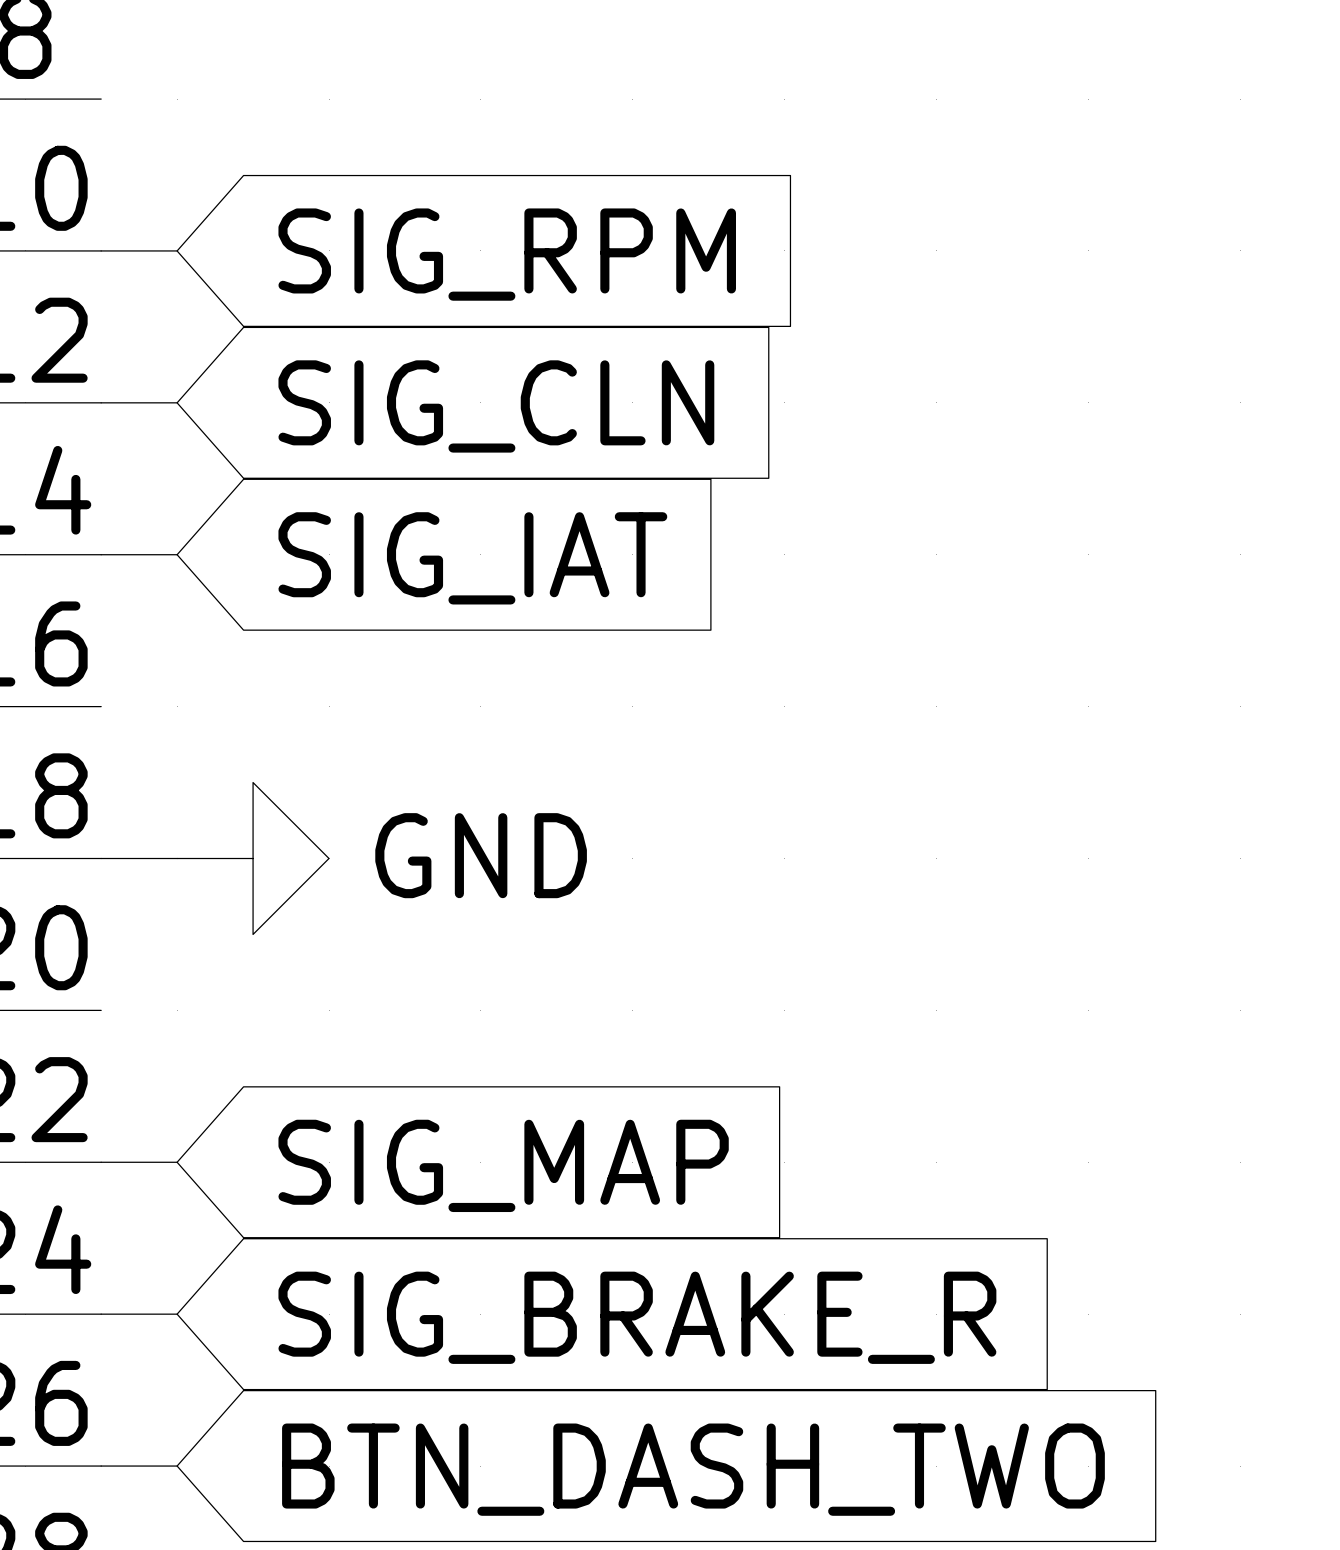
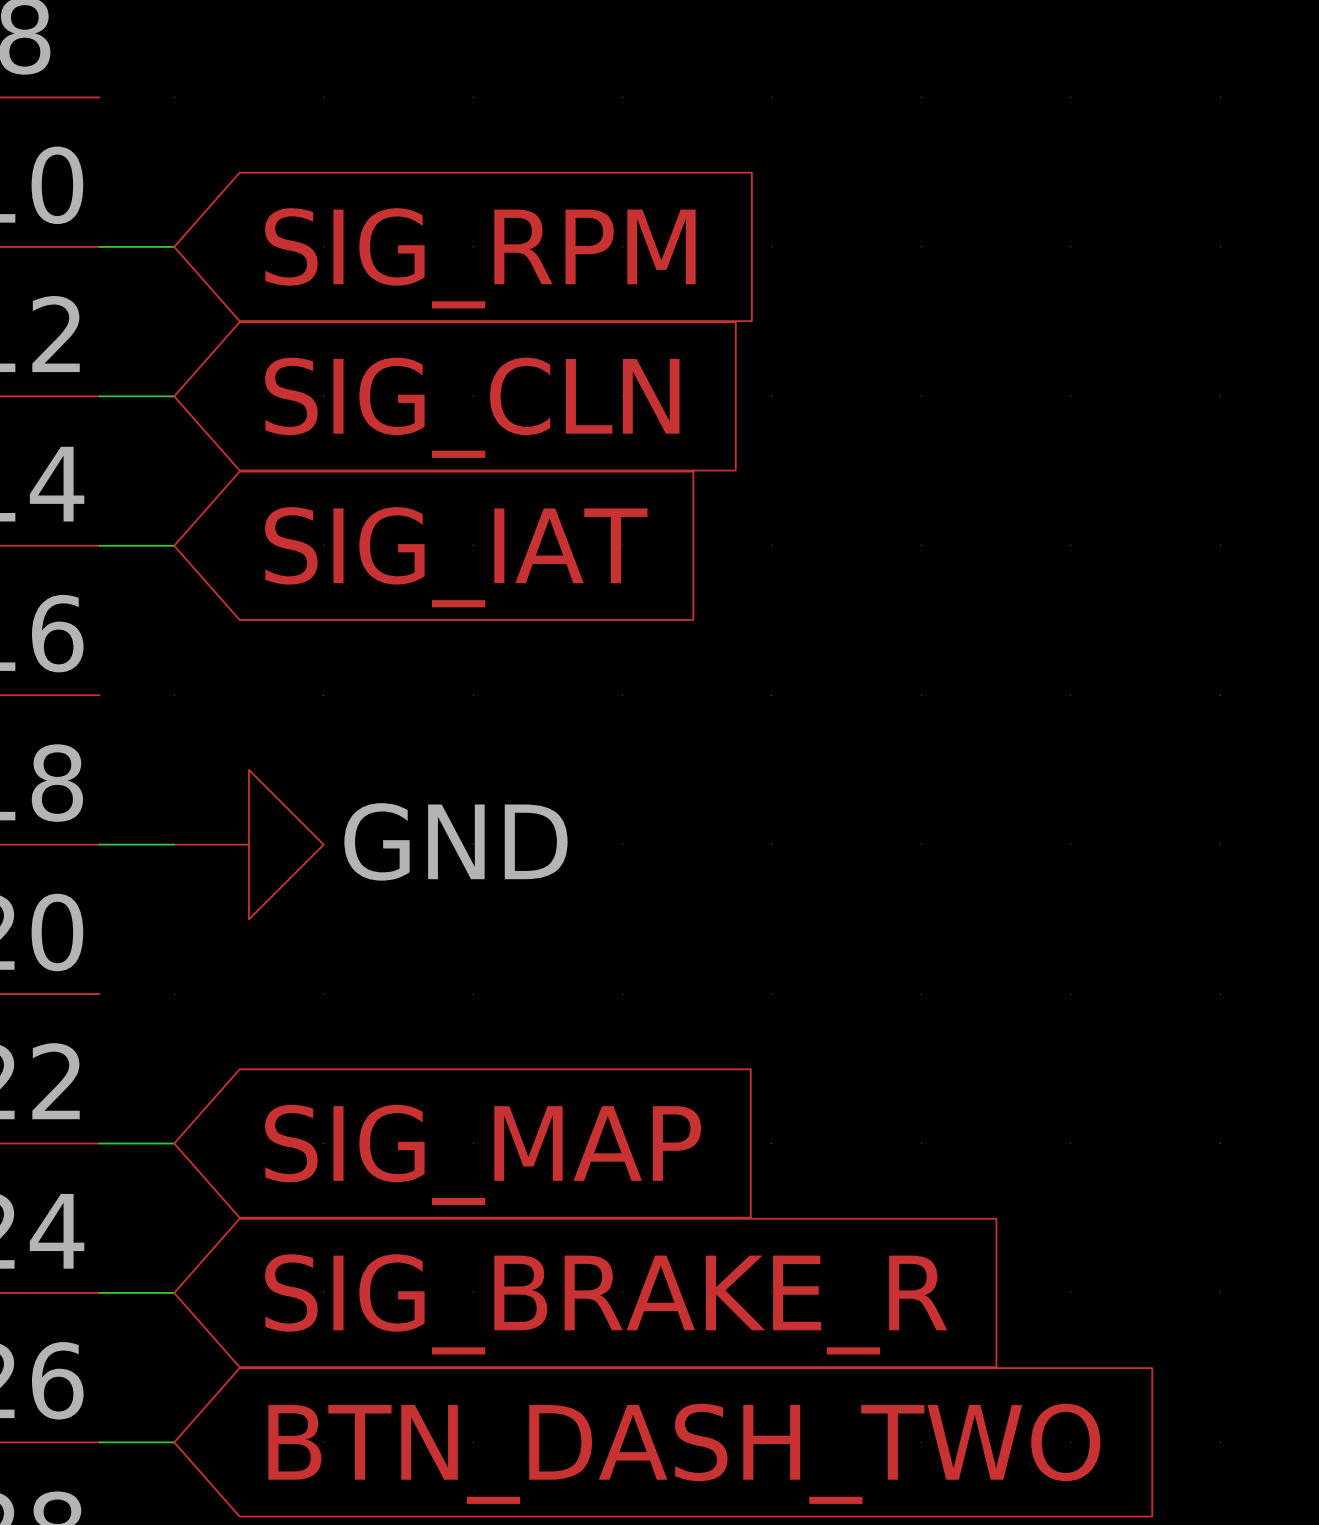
power symbol text position: GND (481, 855) -> GND (455, 841)

